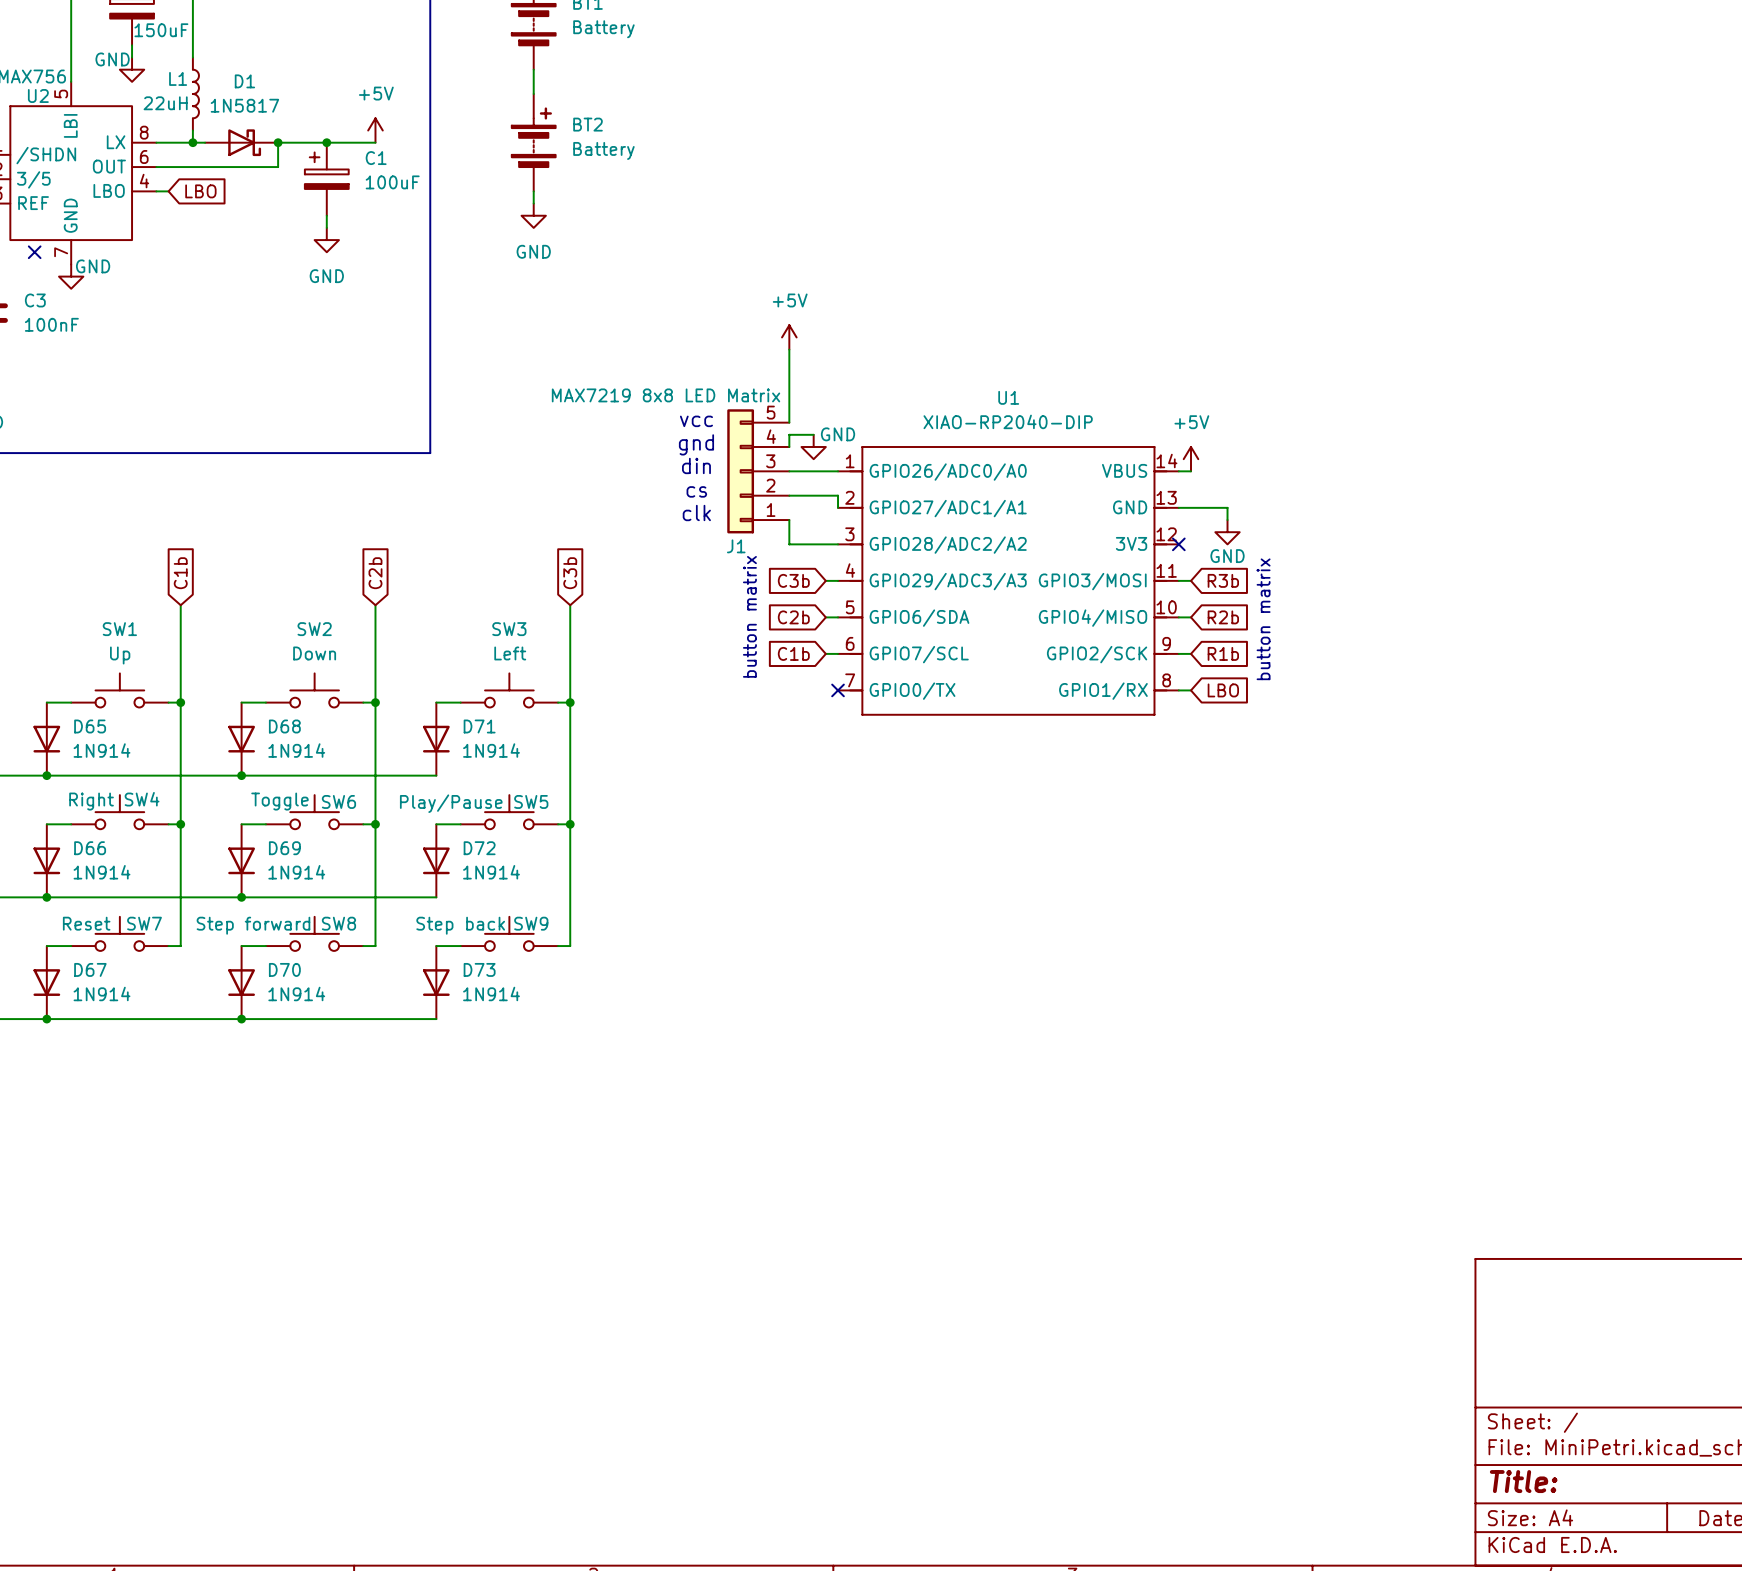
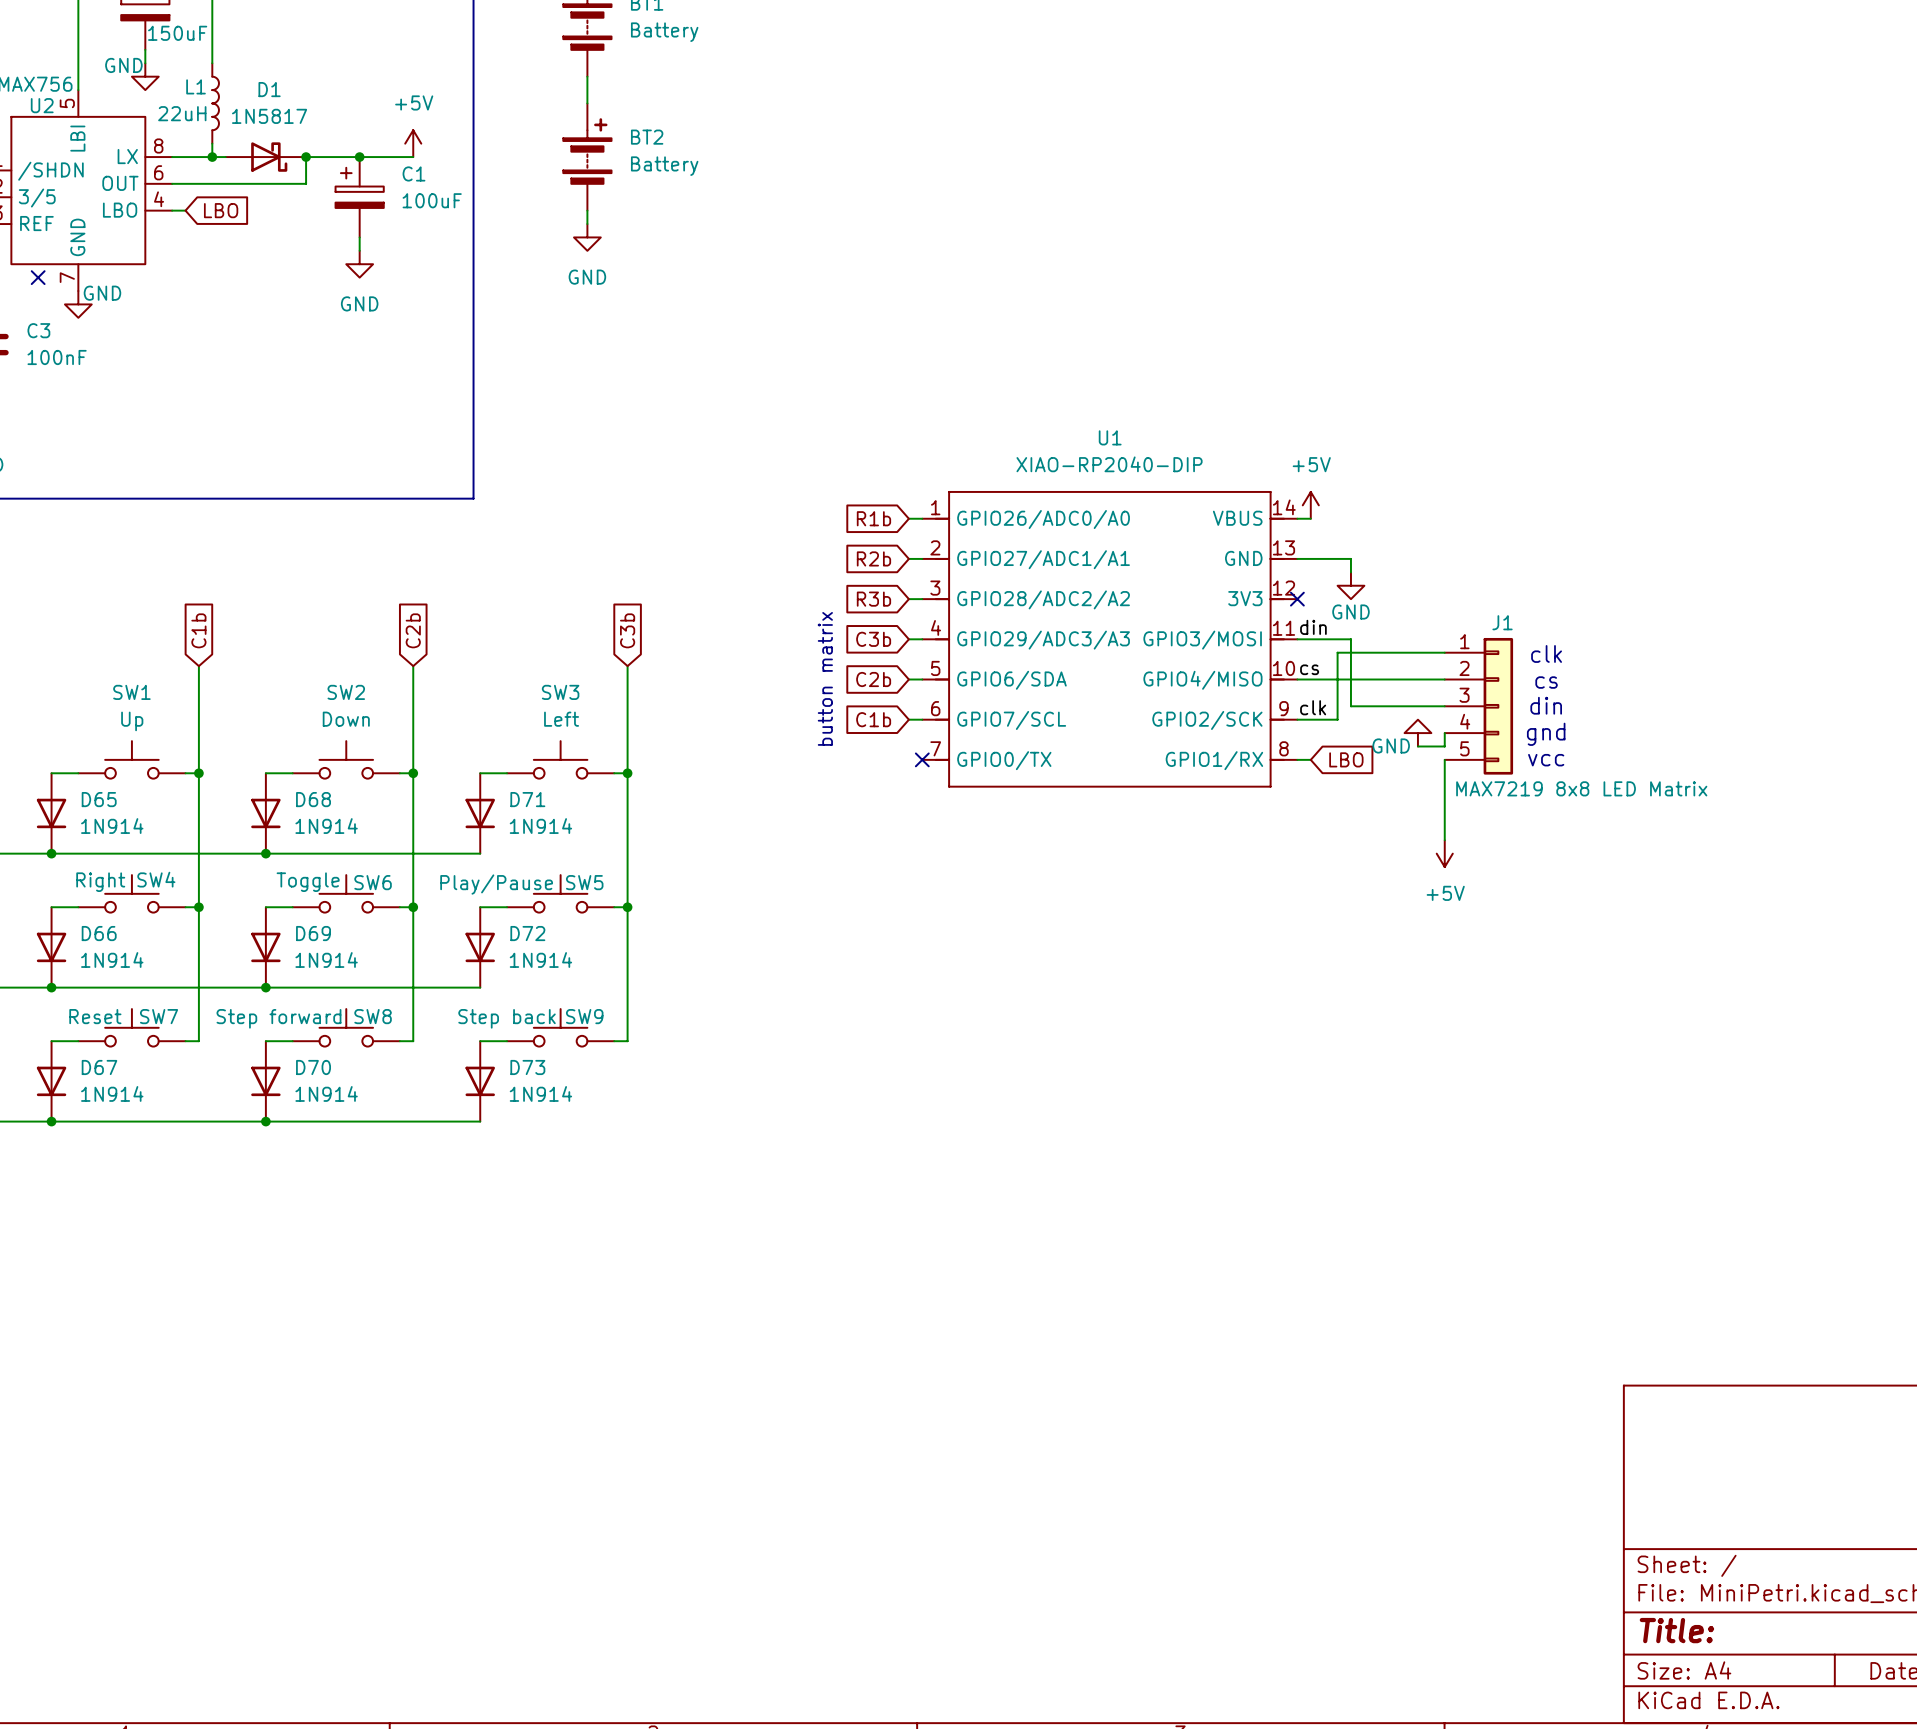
power symbol: +5V (789, 337) -> none
wire: (789, 349) (789, 422) -> none
text: vcc (696, 421) -> none
wire: (813, 434) (789, 434) (789, 446) -> none
text: gnd (696, 444) -> none
power symbol: GND (813, 446) -> none
text: din (696, 465) -> none
J1 rotation: 0° (740, 471) -> 180° (1498, 706)
J1 position: (758, 471) -> (1478, 706)
wire: (789, 471) (825, 471) -> none
global label: none -> R1b (873, 518)
text: cs (696, 491) -> none
wire: (789, 495) (838, 495) (838, 507) -> (908, 558) (922, 558)
global label: none -> R2b (873, 558)
text: clk (696, 512) -> none
wire: (789, 520) (789, 544) (825, 544) -> none
global label: none -> R3b (873, 599)
label: none -> din (1313, 627)
wire: none -> (1310, 639) (1350, 639) (1350, 706) (1444, 706)
global label: R3b (1223, 580) -> none
wire: none -> (1444, 652) (1337, 652) (1337, 719) (1310, 719)
text: none -> clk (1546, 653)
label: none -> cs (1309, 669)
wire: none -> (1310, 679) (1444, 679)
global label: R2b (1223, 617) -> none
text: button matrix (1263, 619) -> none
text: none -> cs (1546, 682)
text: none -> din (1546, 705)
label: none -> clk (1313, 707)
global label: R1b (1223, 653) -> none
power symbol: none -> GND (1417, 733)
wire: none -> (1444, 733) (1444, 746) (1417, 746)
text: none -> gnd (1546, 734)
wire: none -> (1444, 759) (1444, 840)
text: none -> vcc (1546, 760)
power symbol: none -> +5V (1444, 853)

